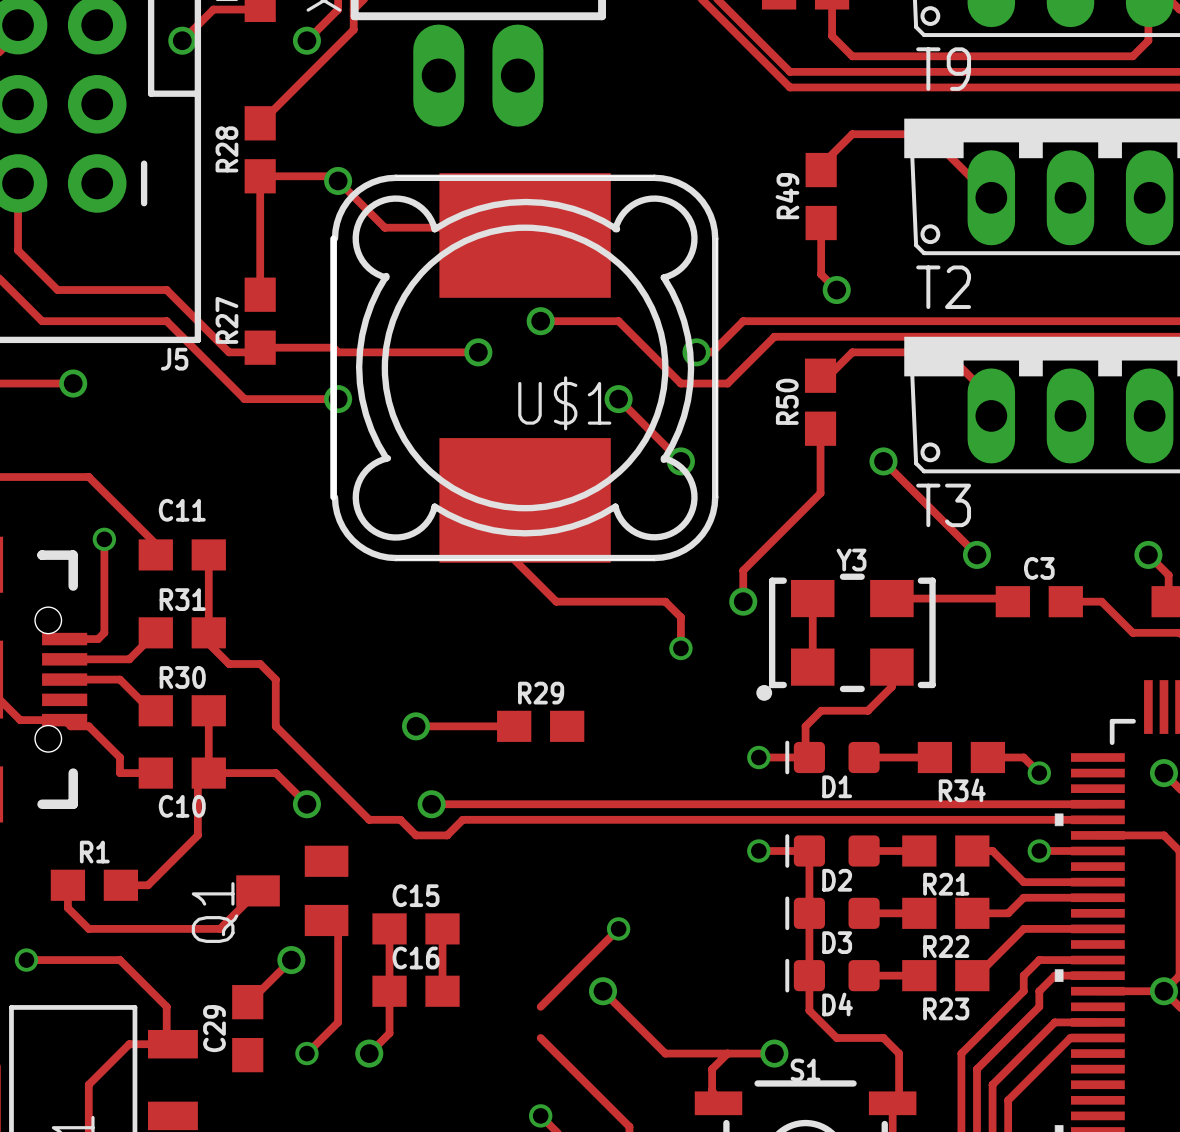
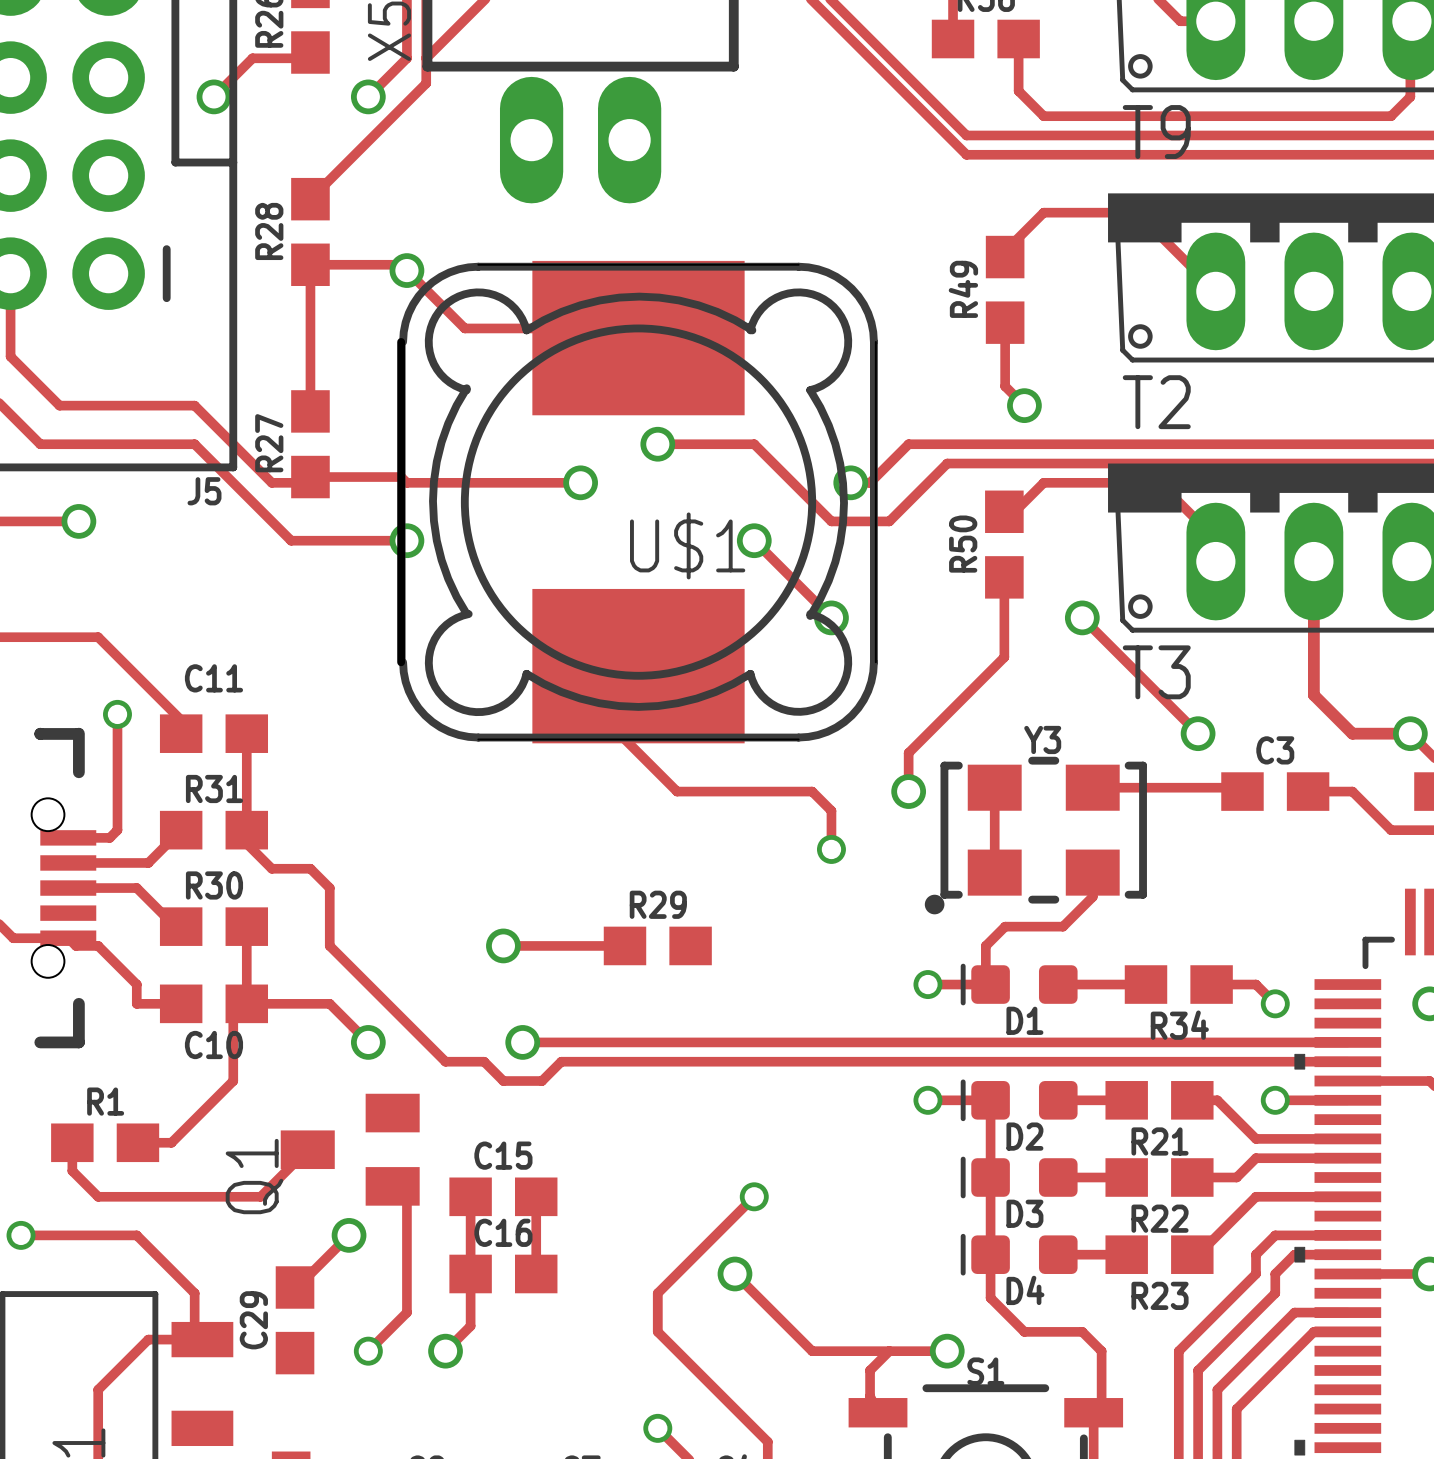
track: none -> (1313, 561) (1313, 695) (1352, 733) (1410, 733)
track: none -> (657, 1293) (657, 1331)

